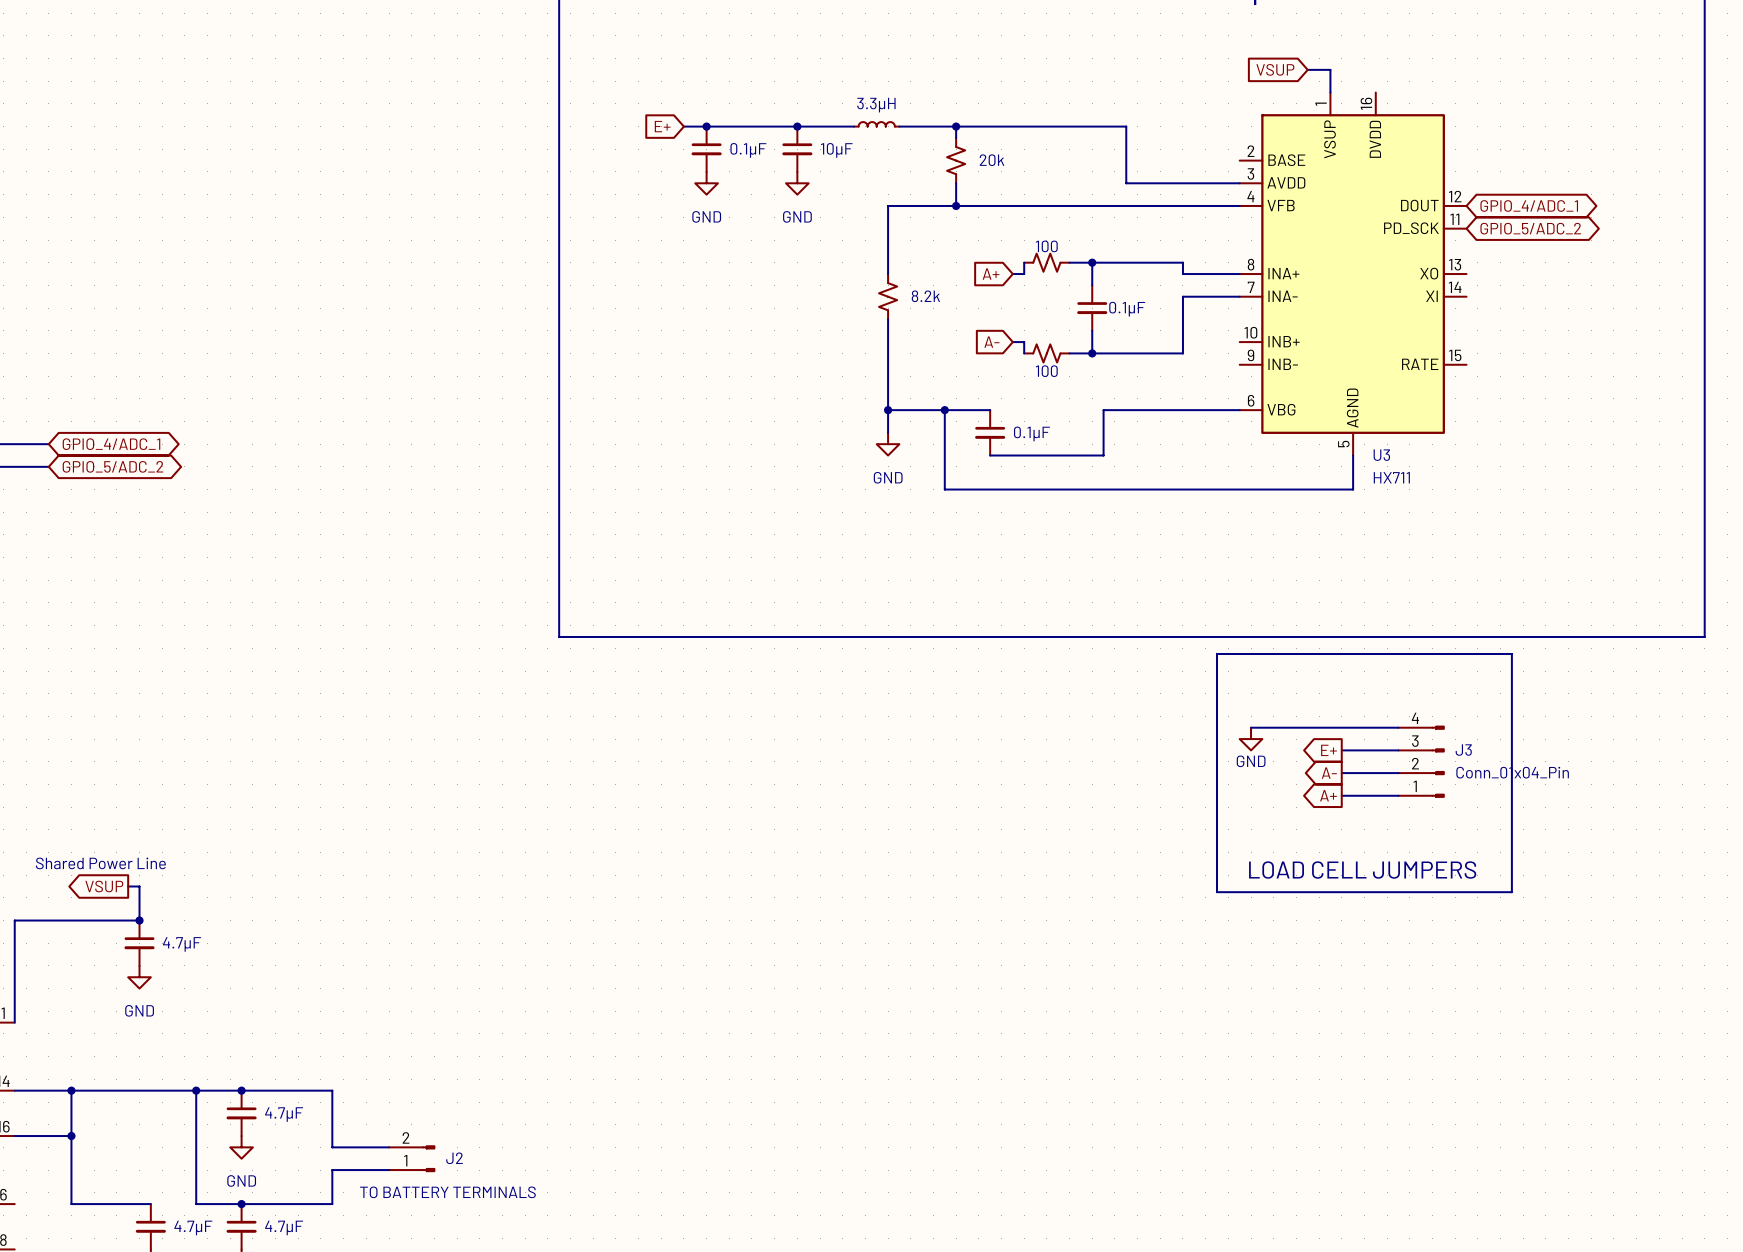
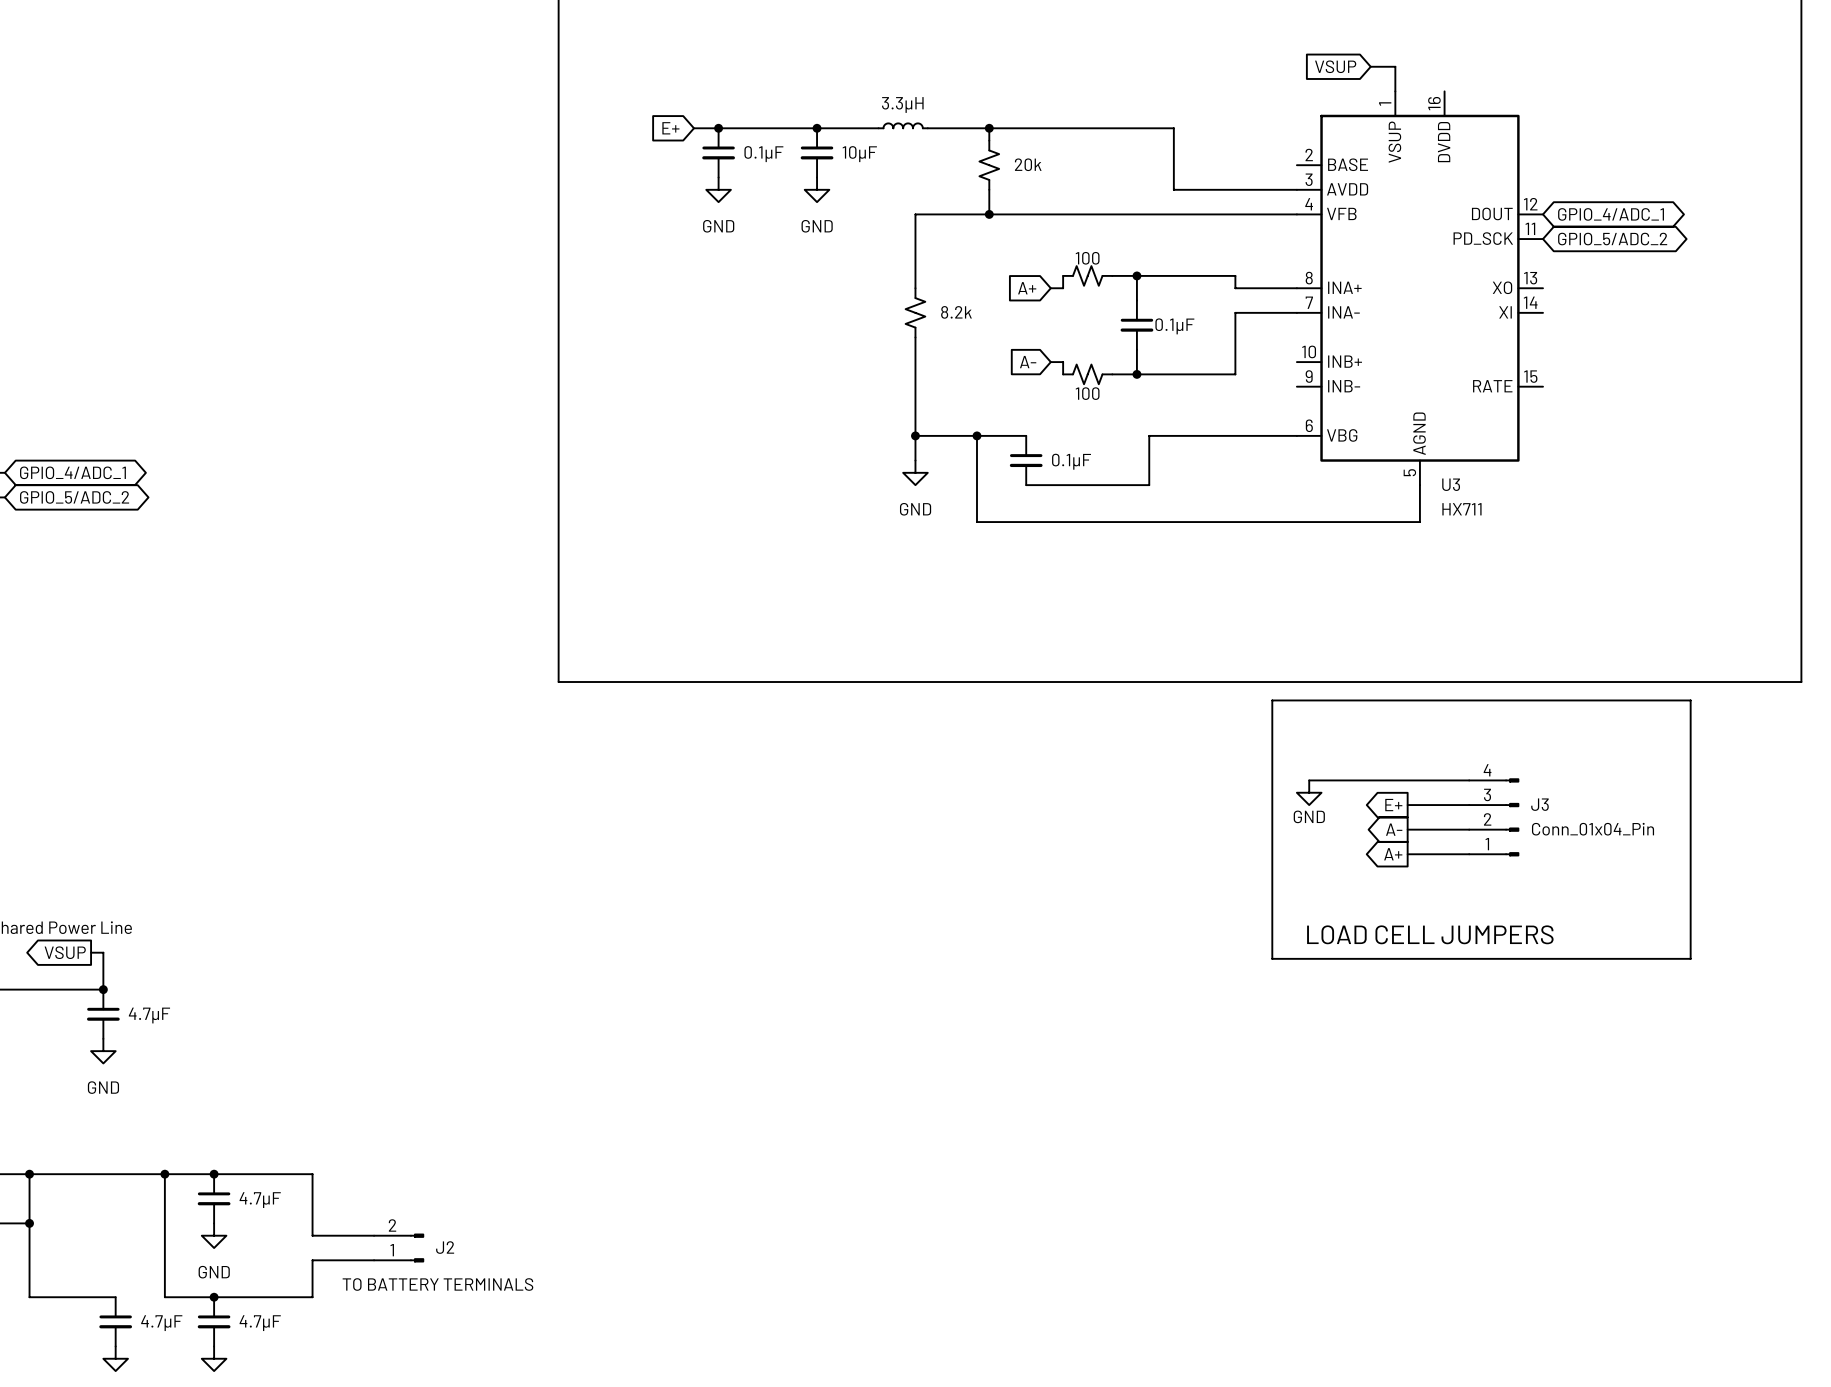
line: (1511, 653) (1511, 892) -> (1592, 700) (1690, 700) (1690, 958) (1592, 958)

